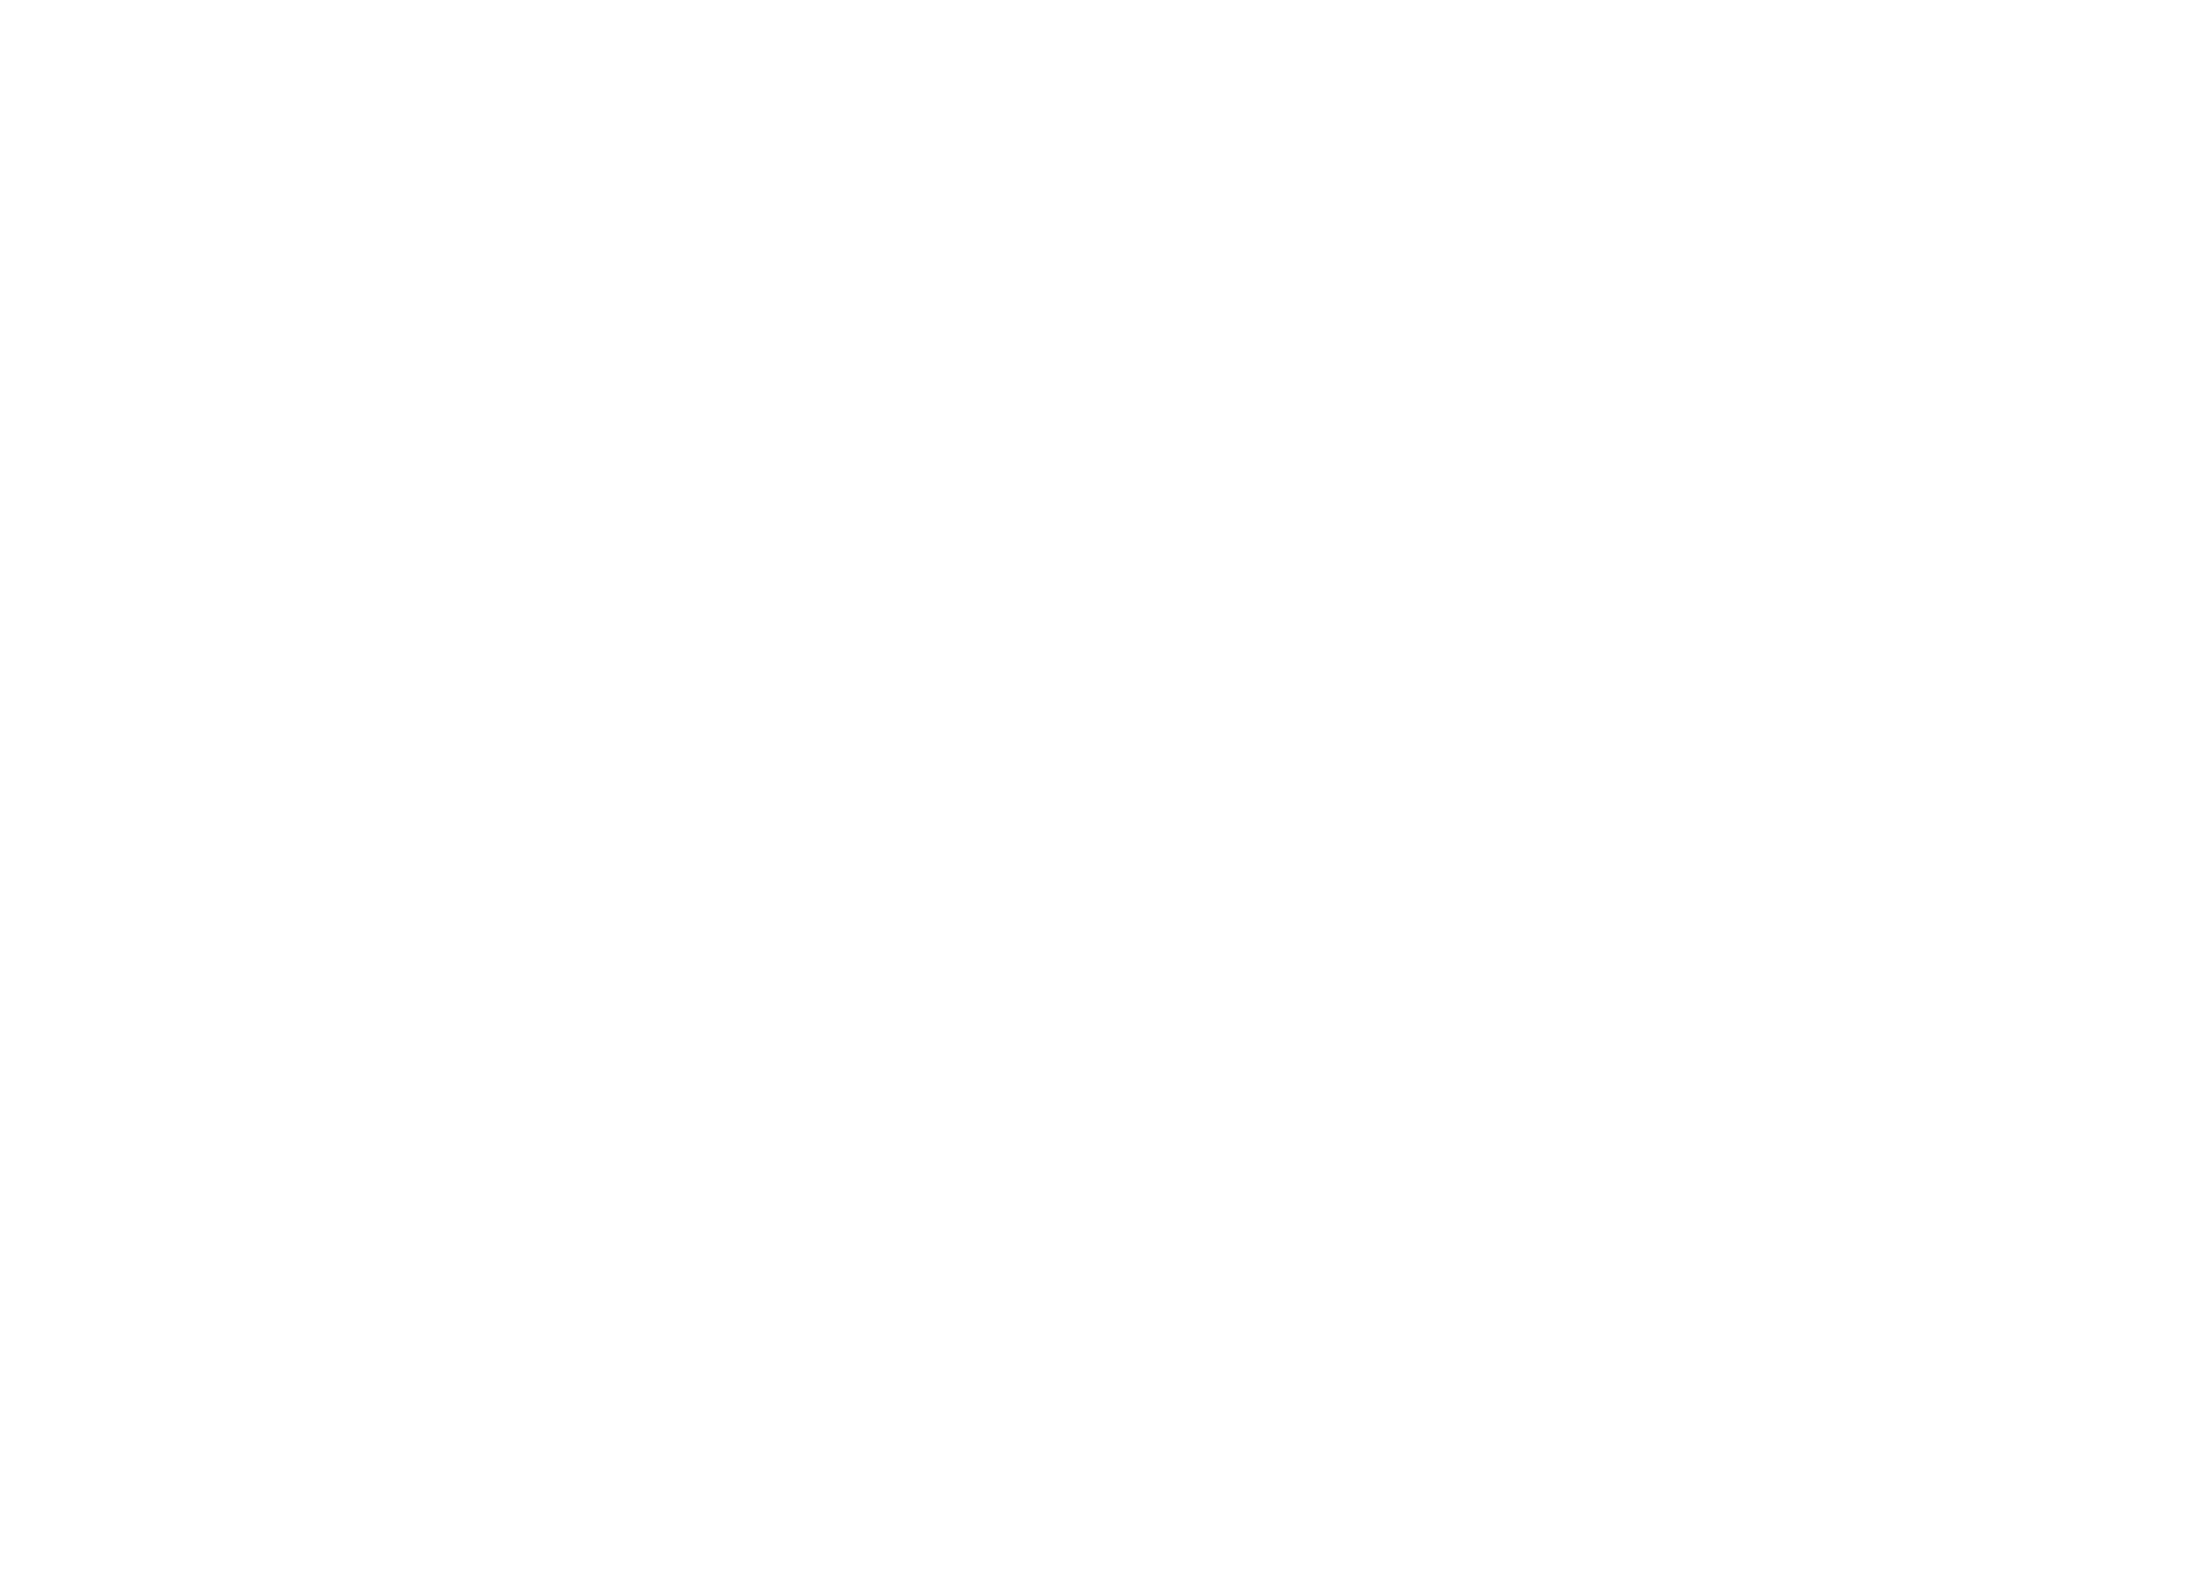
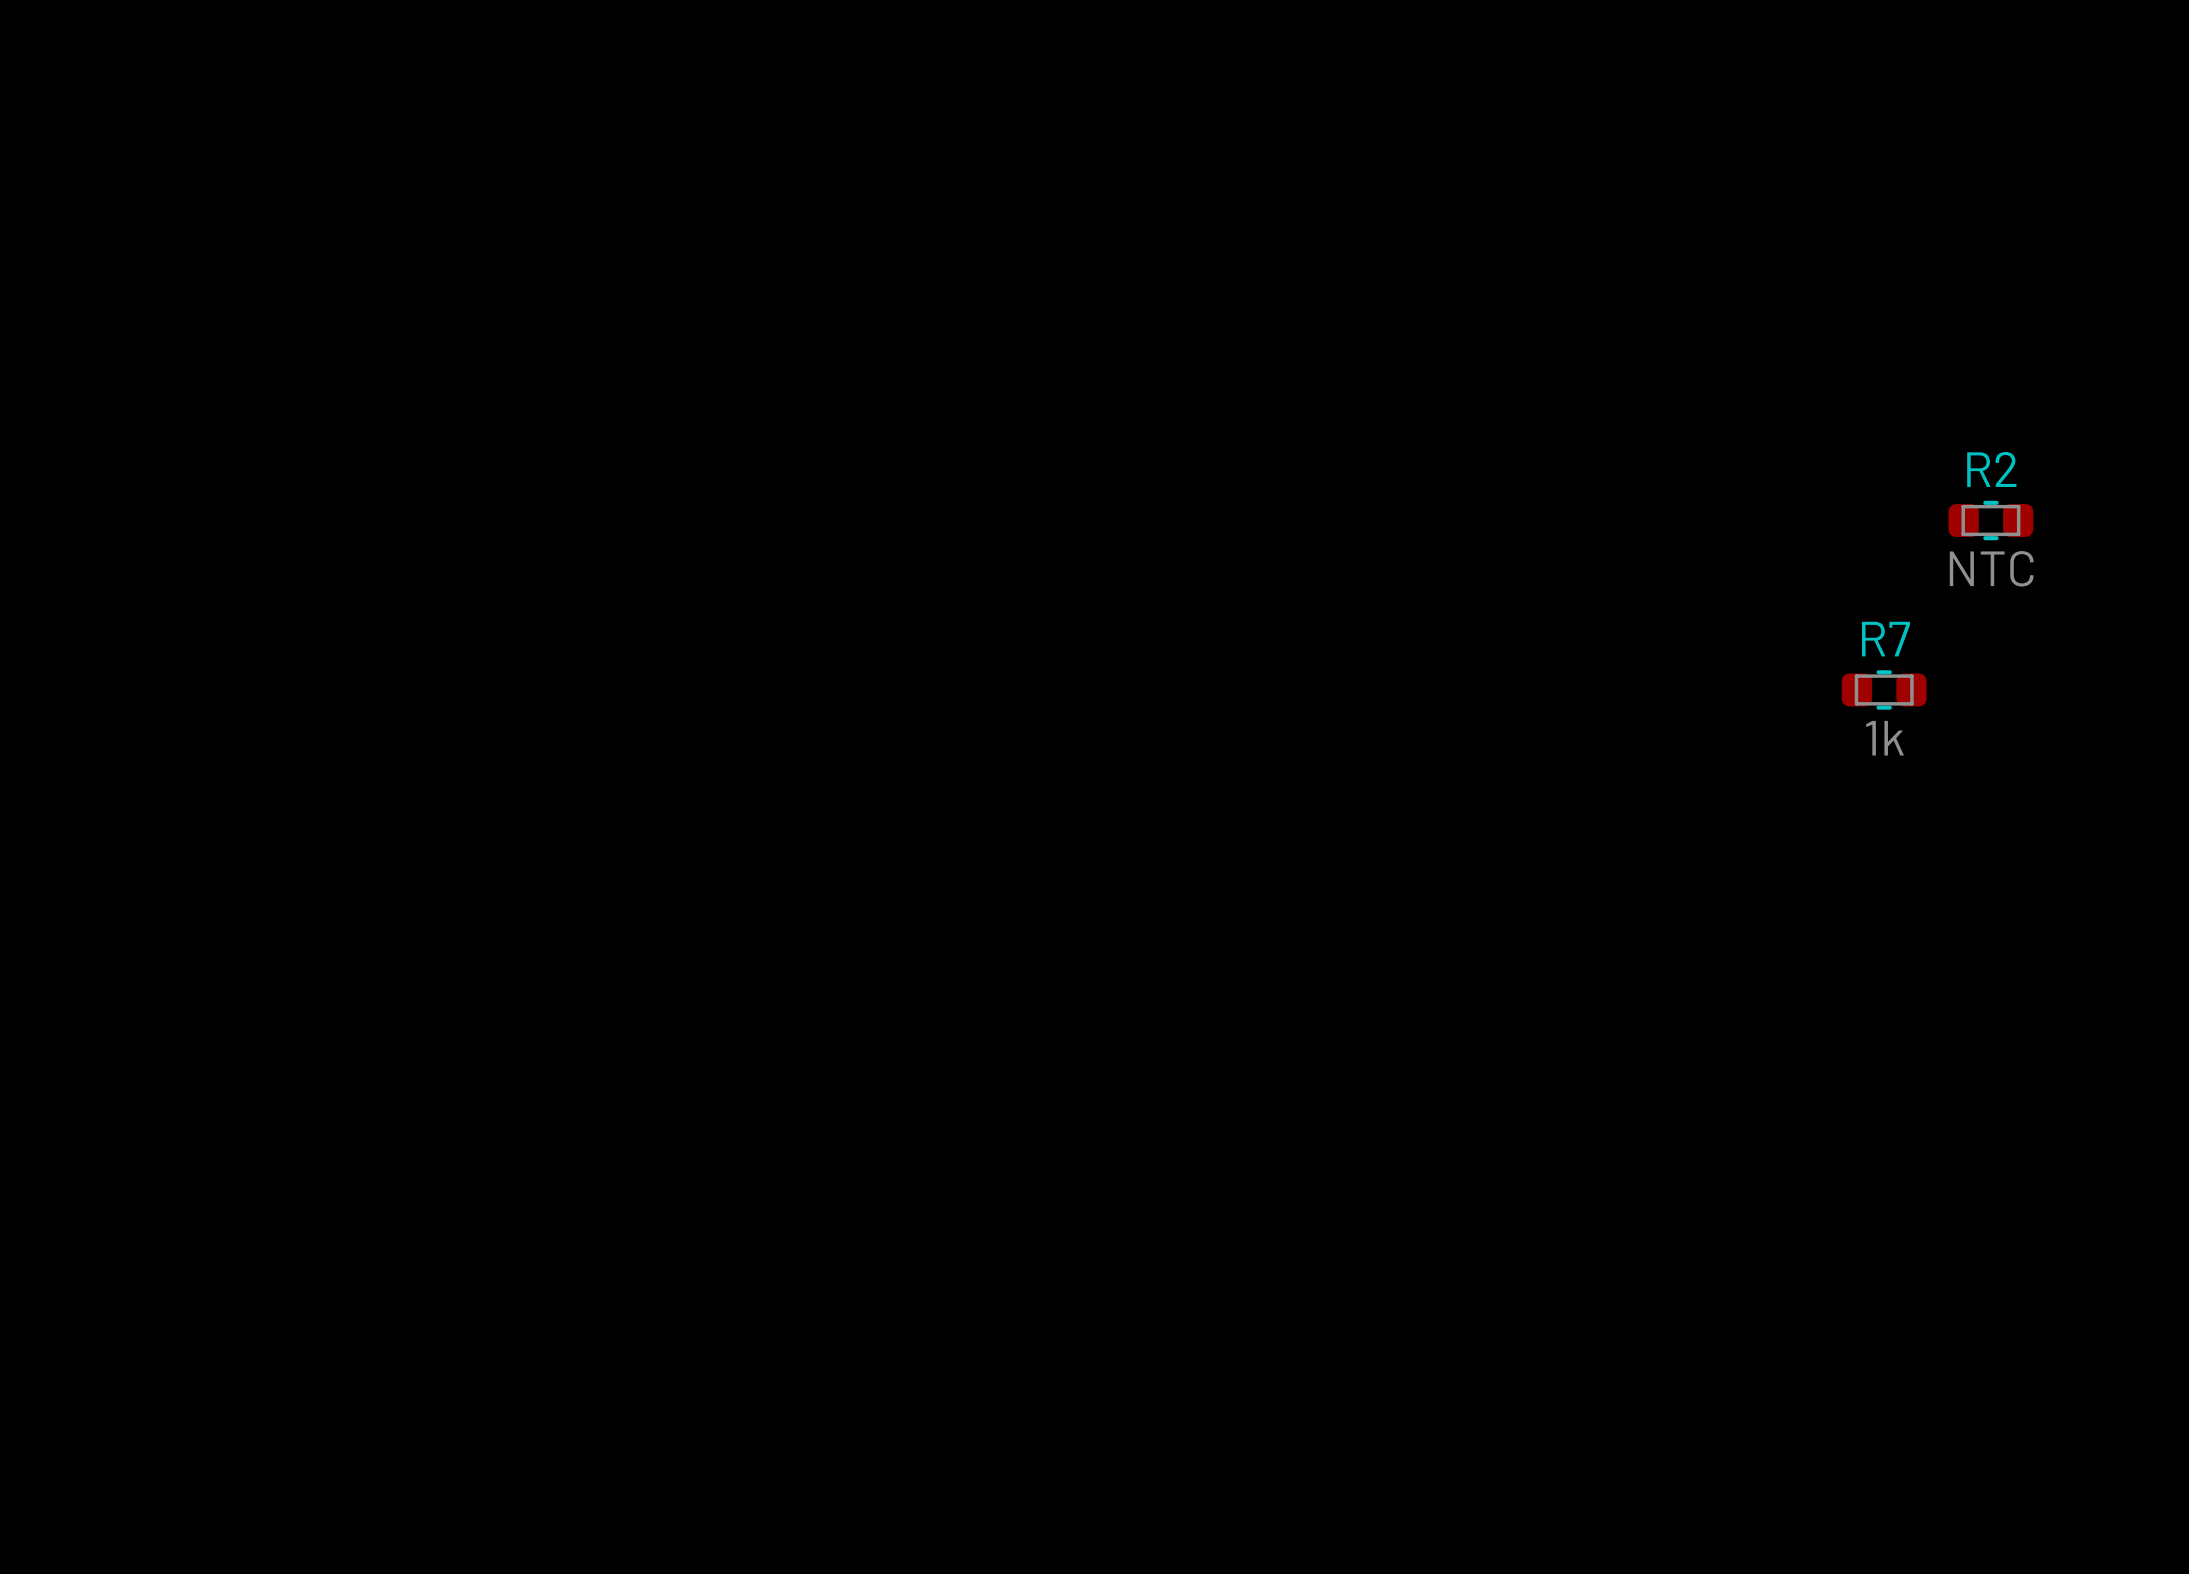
R2: none -> NTC (1990, 520)
R7: none -> 1k (1884, 689)

